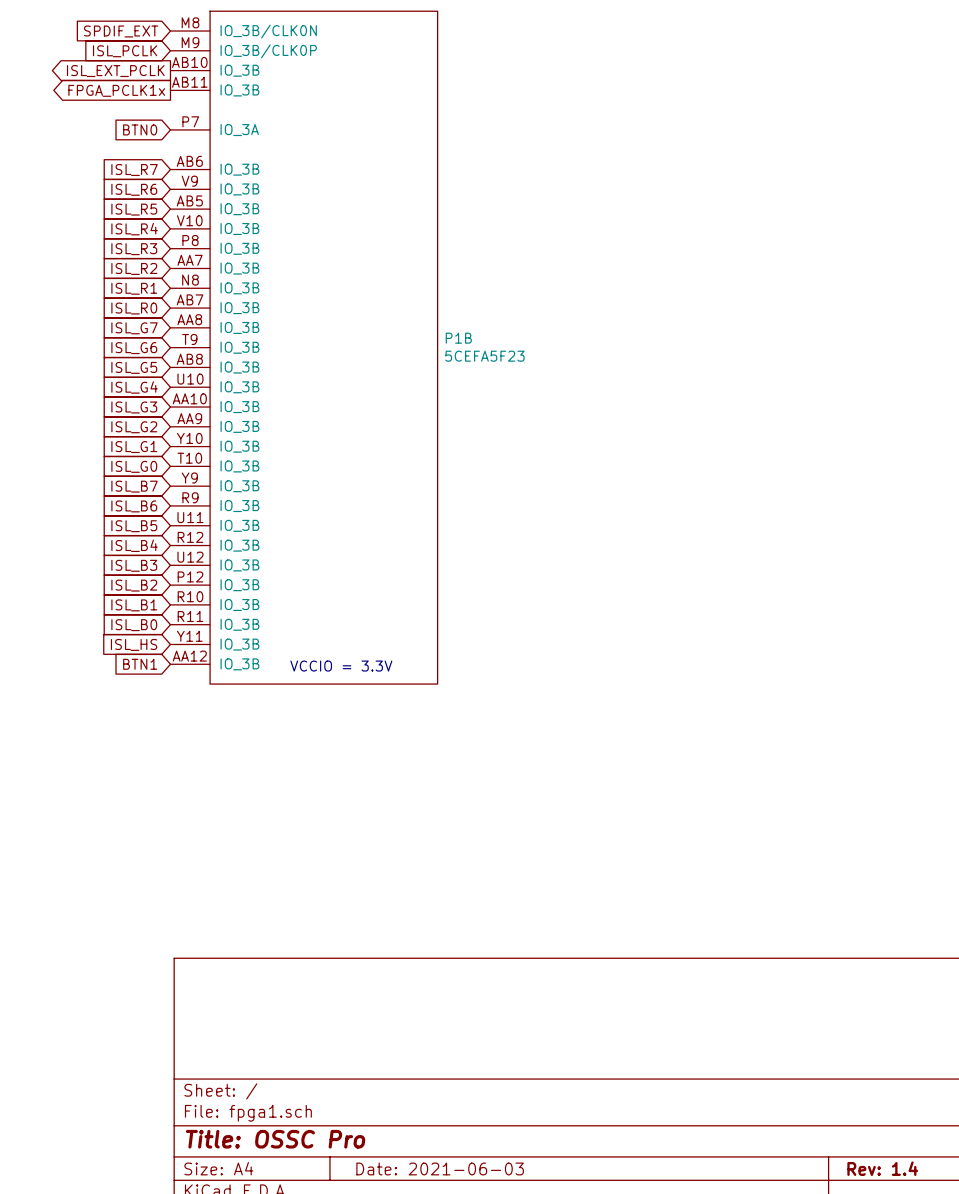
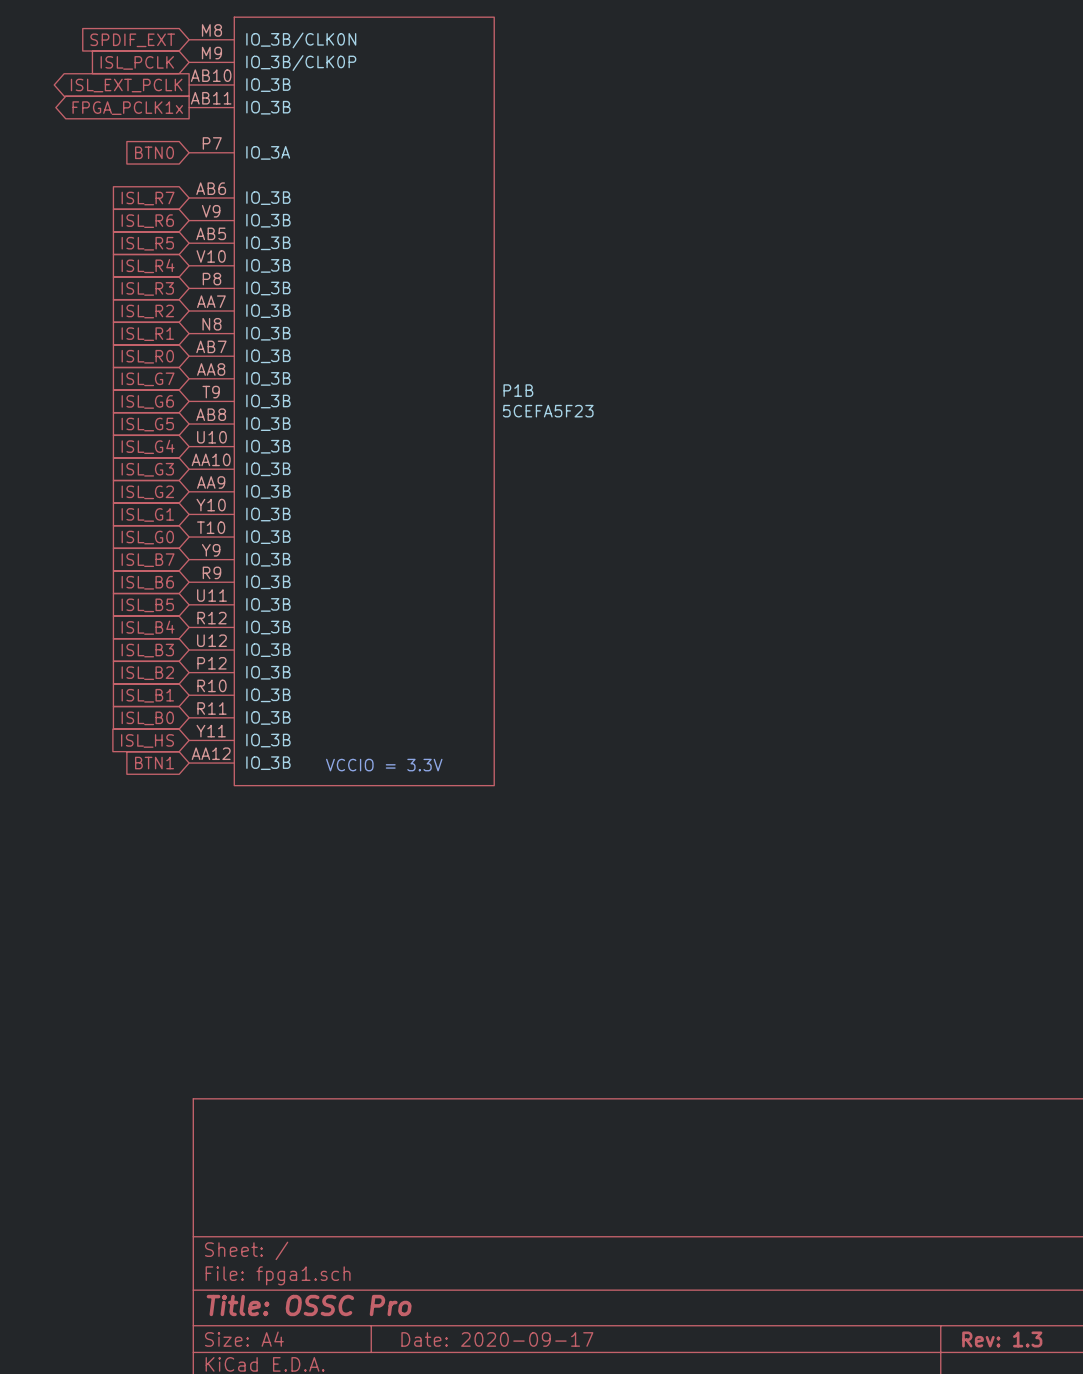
title block: Date: 2021-06-03 (440, 1168) -> Date: 2020-09-17 (497, 1339)
title block: Rev: 1.4 (882, 1168) -> Rev: 1.3 (1002, 1339)

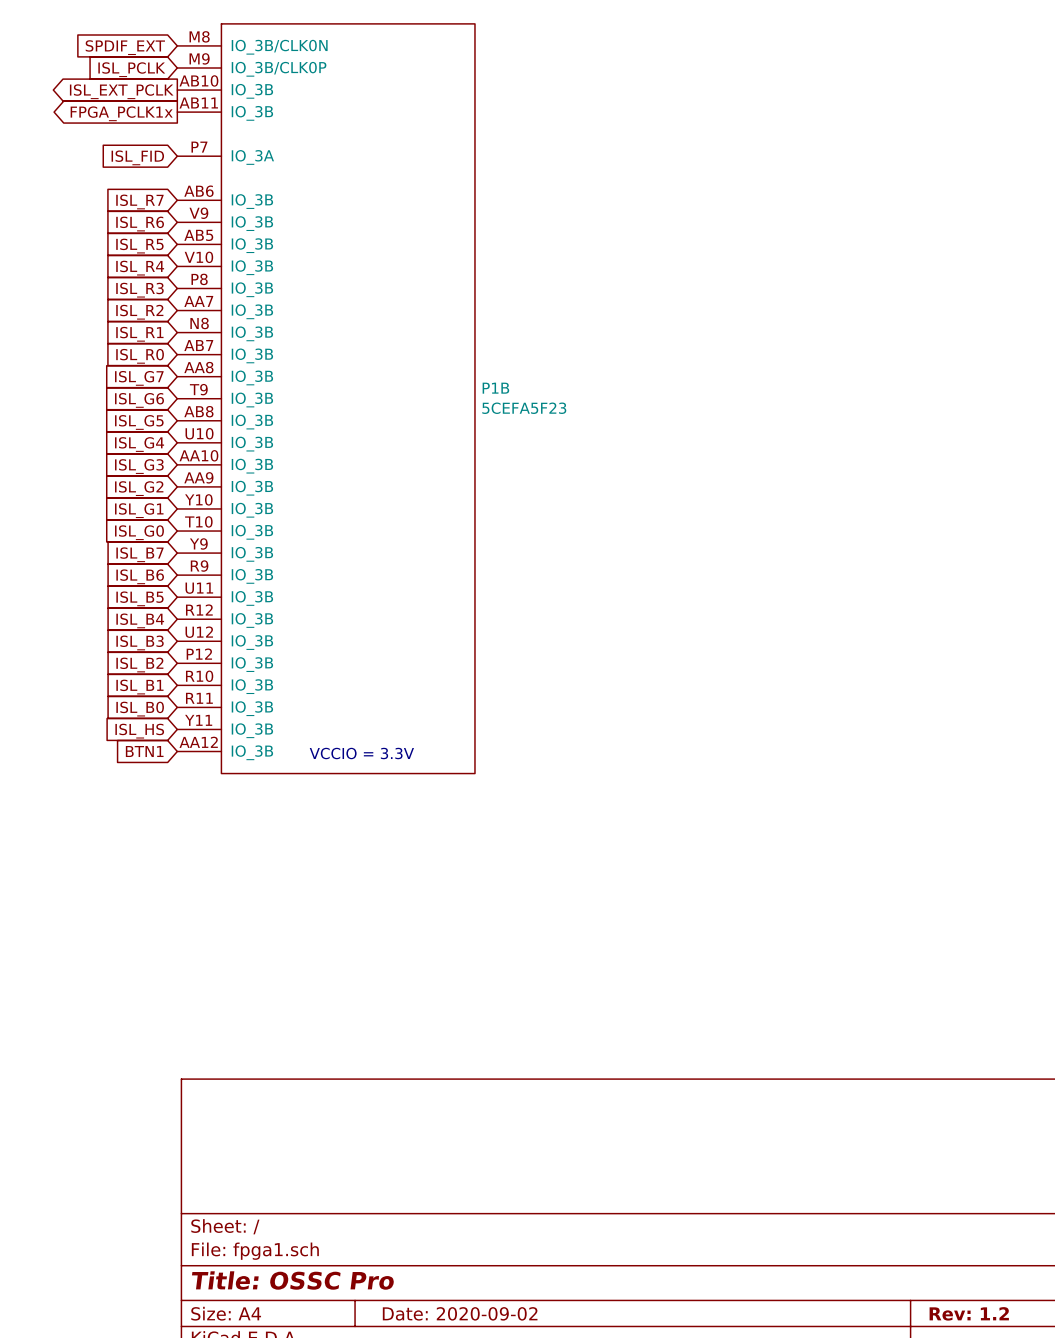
global label: BTN0 (154, 152) -> ISL_FID (137, 157)
title block: Date: 2020-09-17 (497, 1339) -> Date: 2020-09-02 (460, 1313)
title block: Rev: 1.3 (1002, 1339) -> Rev: 1.2 (969, 1313)

